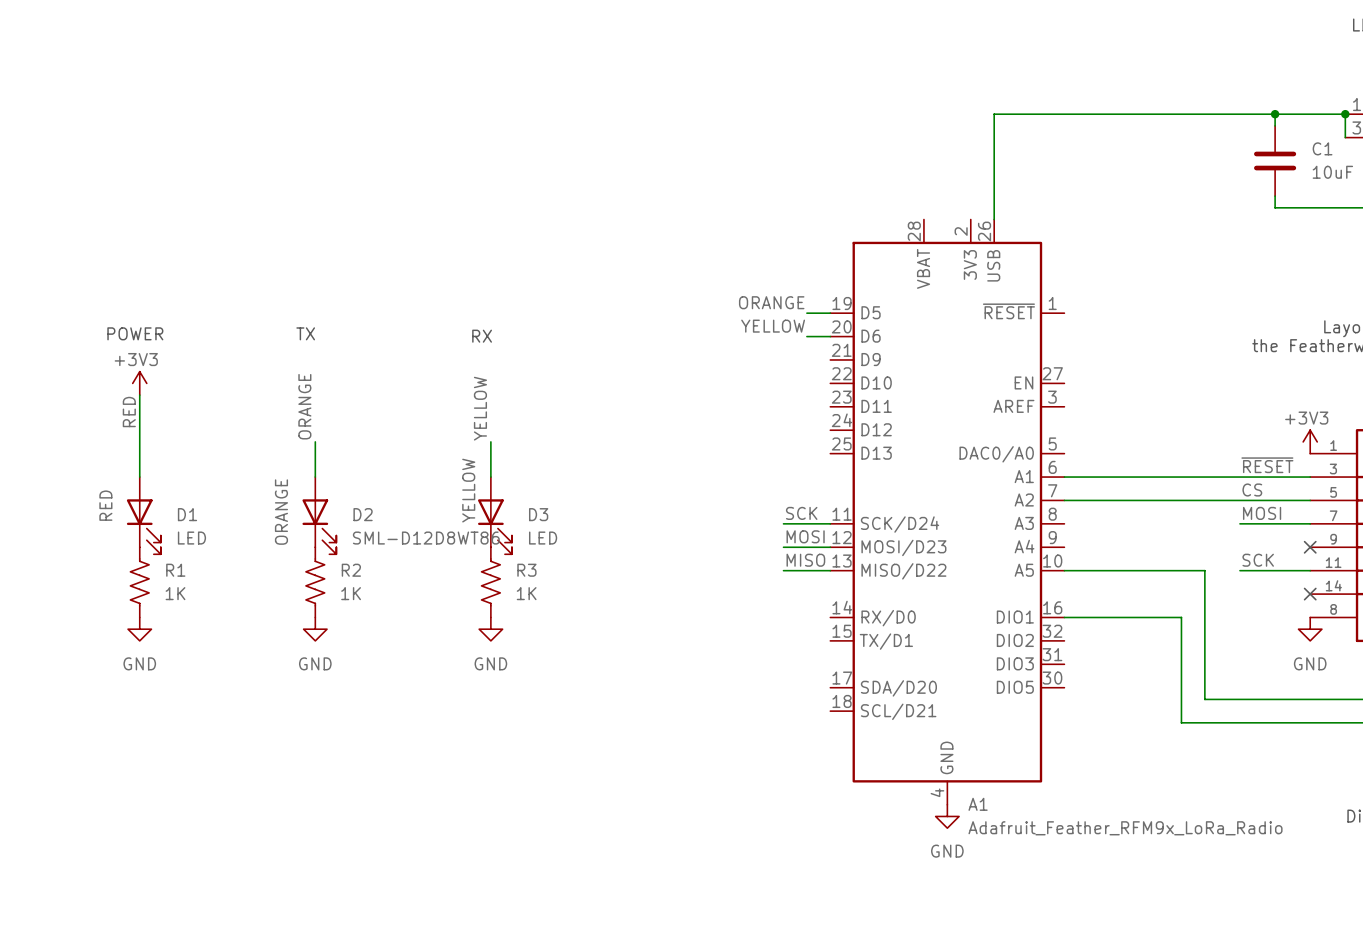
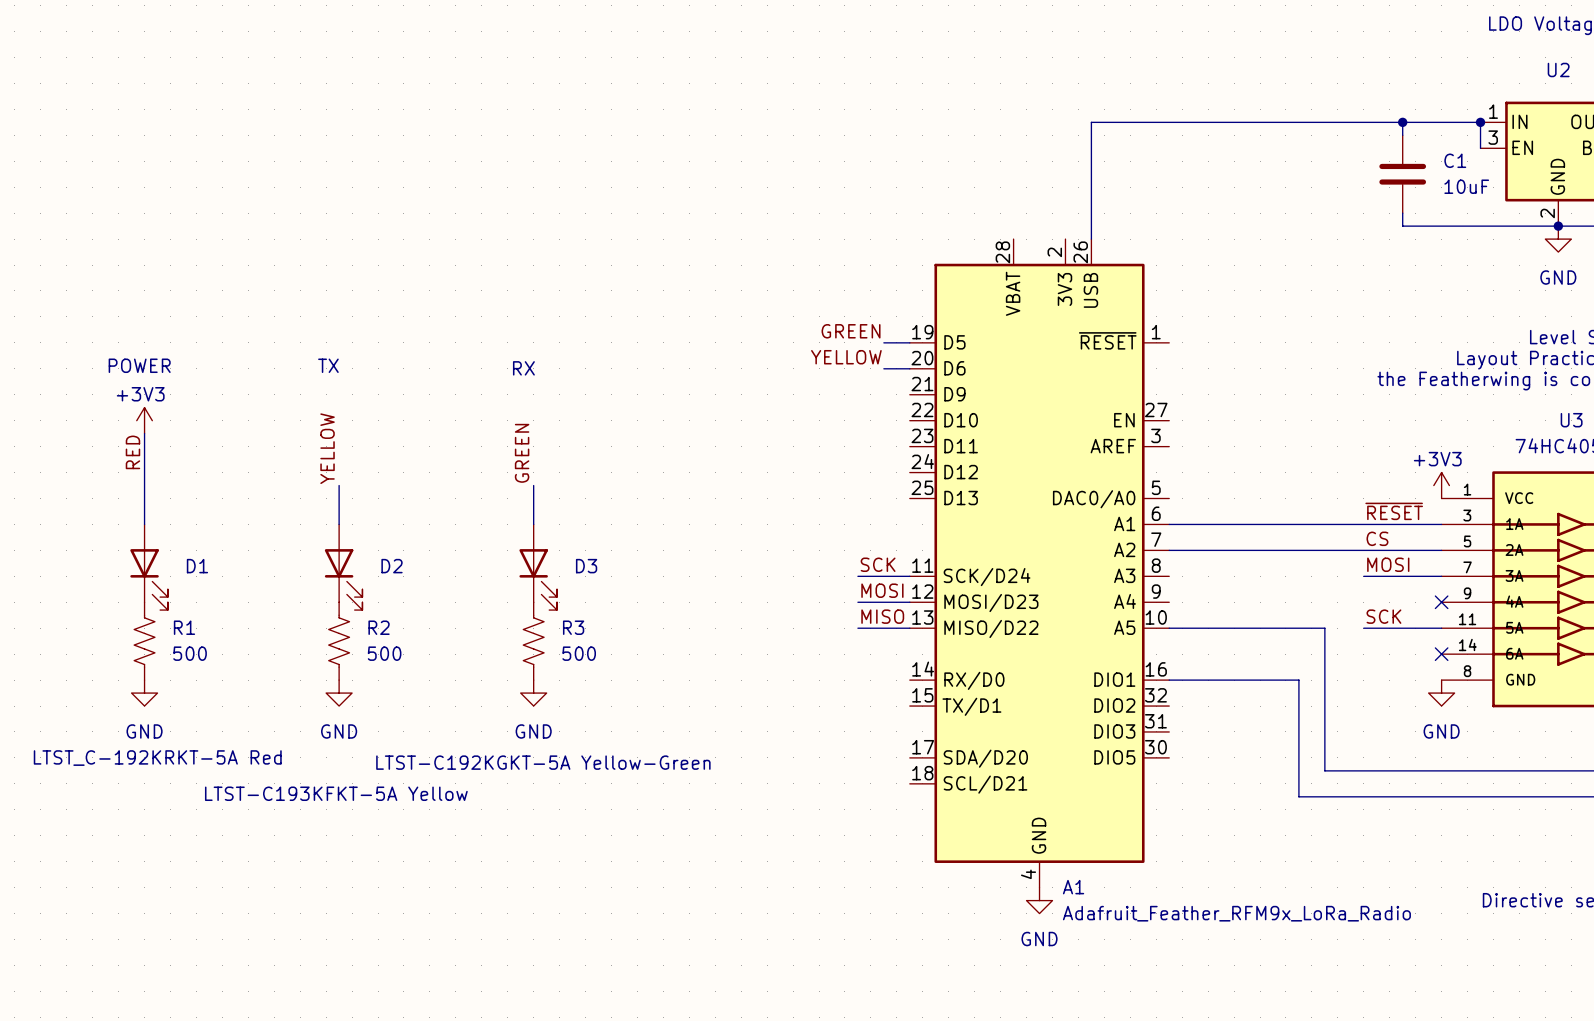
label: ORANGE (771, 302) -> GREEN (851, 331)
label: ORANGE (304, 406) -> YELLOW (327, 448)
label: YELLOW (480, 408) -> GREEN (522, 453)
label: YELLOW (468, 490) -> none
label: RED (105, 505) -> none
label: ORANGE (281, 512) -> none
D1 value: LED (191, 538) -> LTST_C-192KRKT-5A Red (157, 758)
D2 value: SML-D12D8WT86 (426, 538) -> LTST-C193KFKT-5A Yellow (336, 793)
D3 value: LED (543, 538) -> LTST-C192KGKT-5A Yellow-Green (543, 762)
R1 value: 1K (175, 593) -> 500 (190, 653)
R2 value: 1K (351, 593) -> 500 (384, 653)
R3 value: 1K (526, 593) -> 500 (579, 653)

